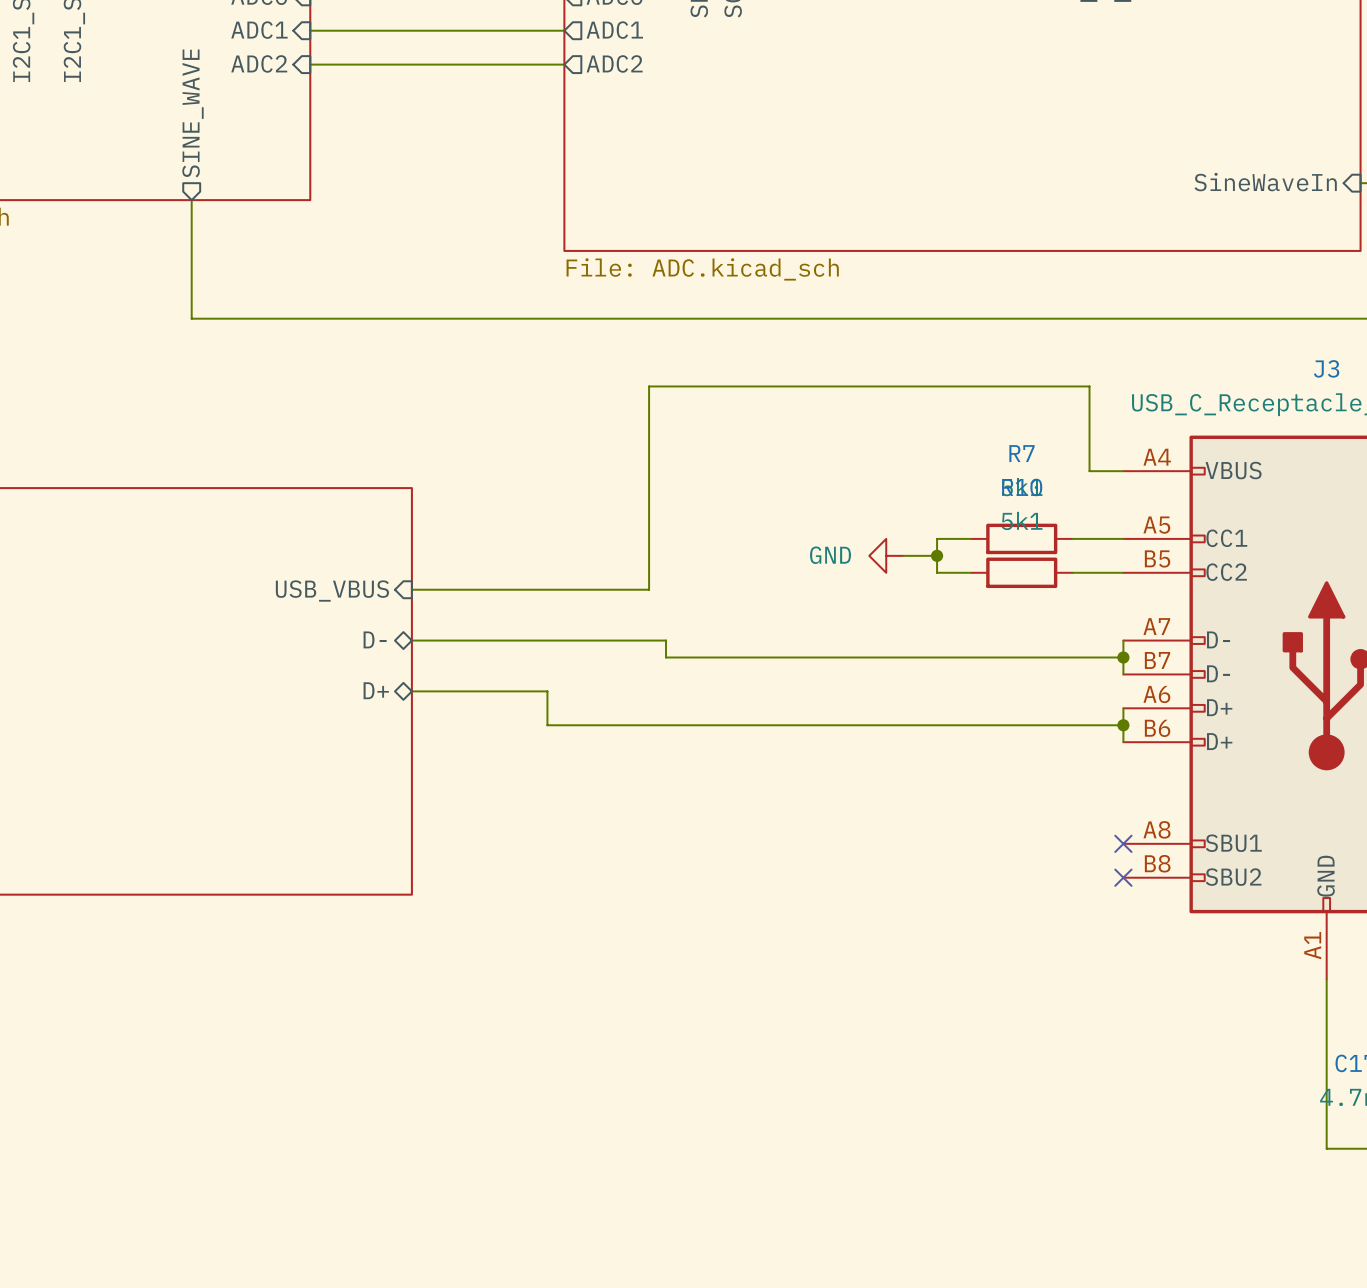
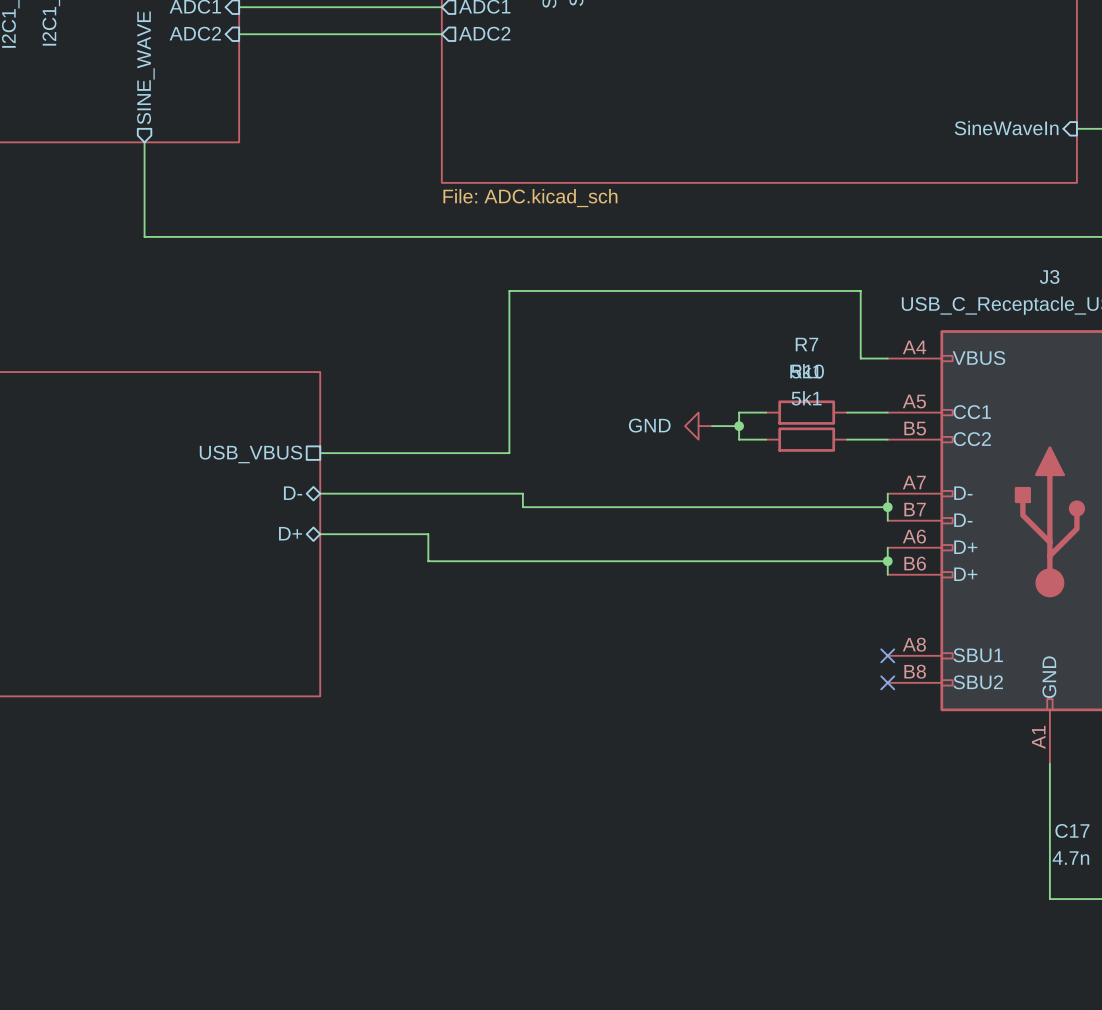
sheet pin shape: input (332, 591) -> passive (250, 454)

